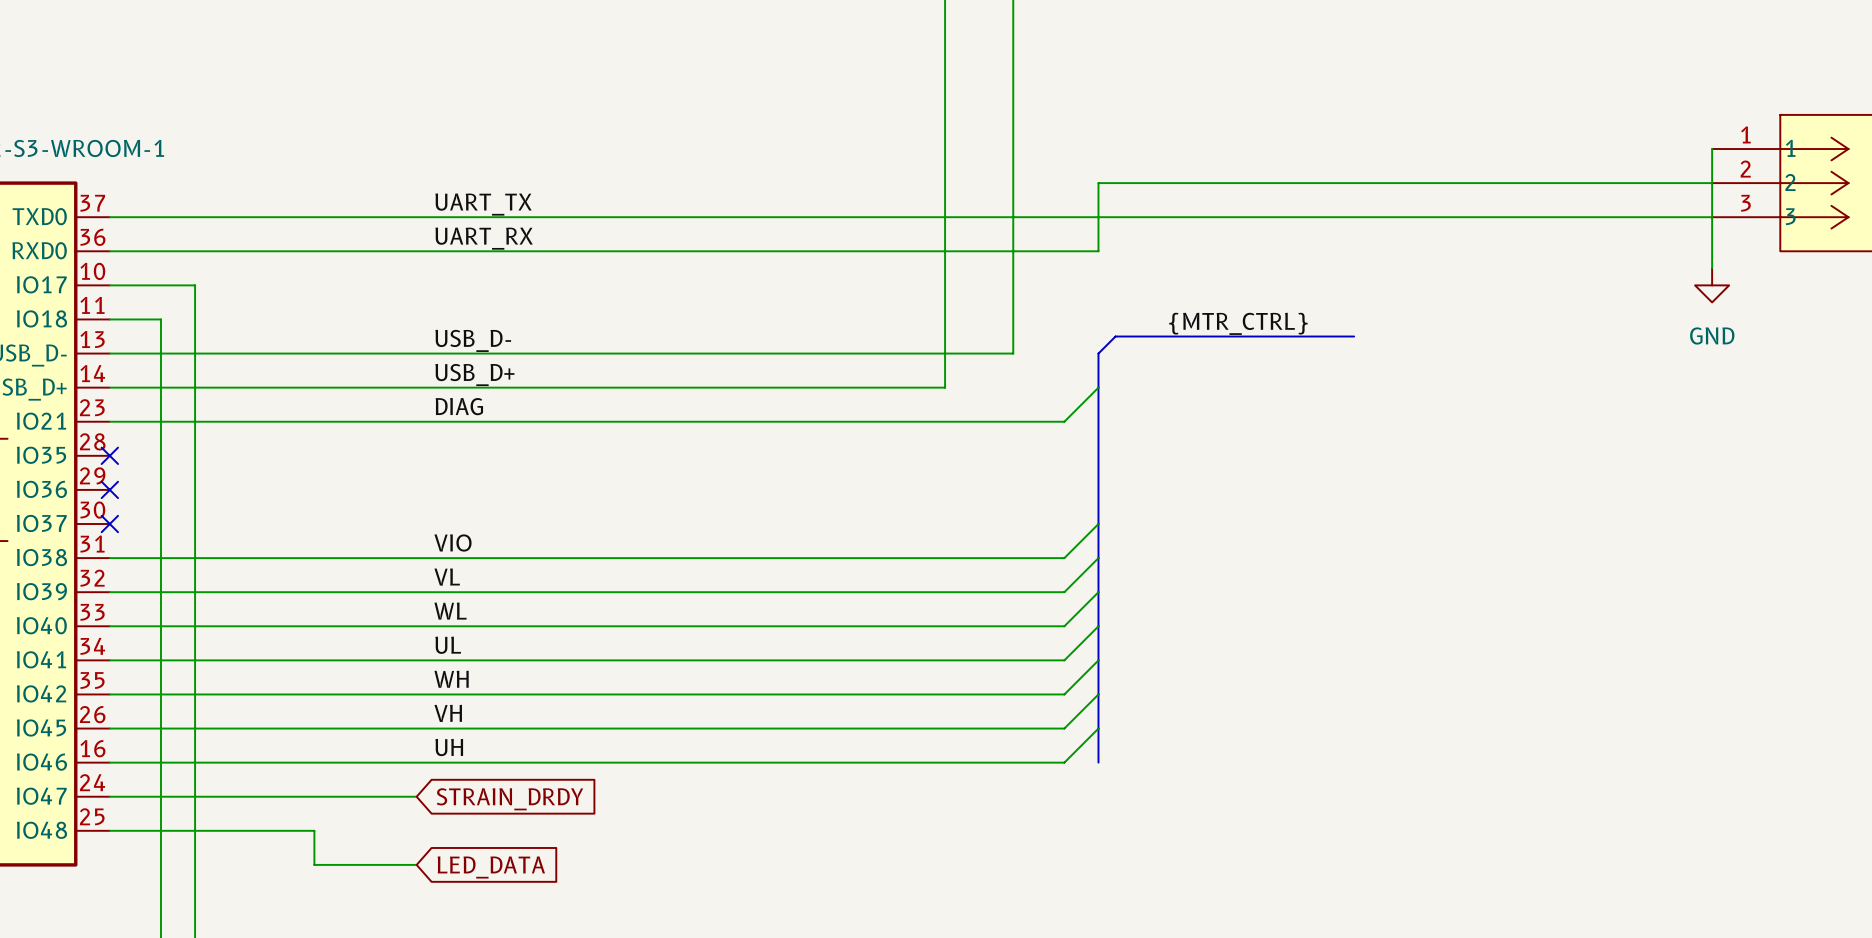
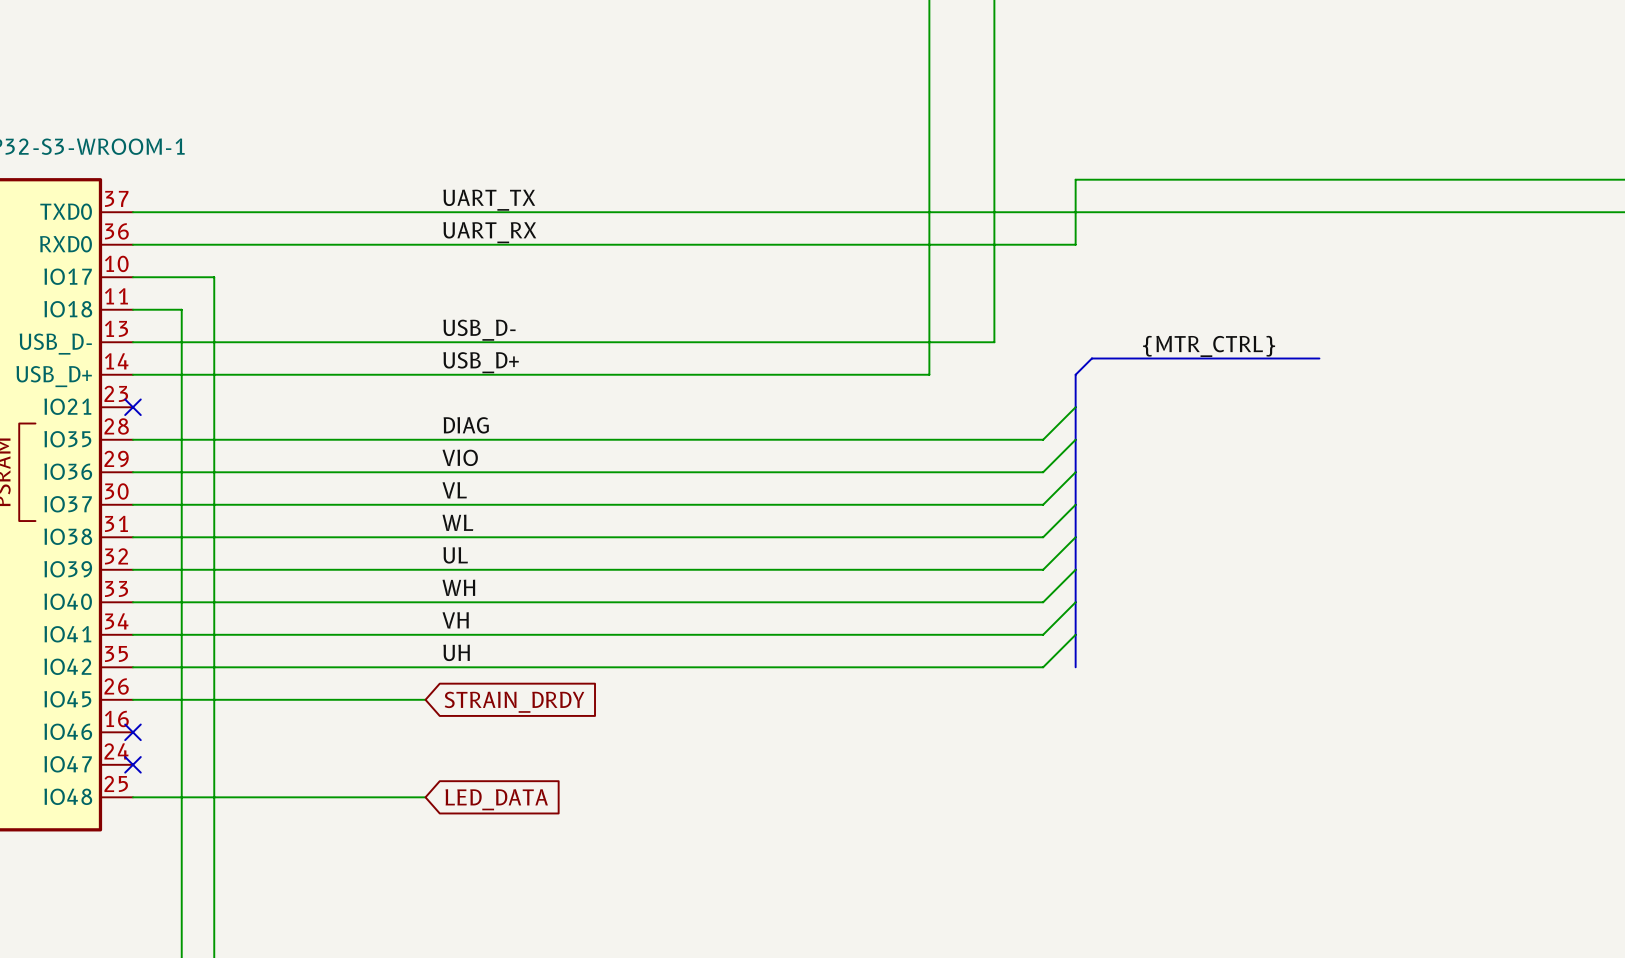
label position: {MTR_CTRL} (1238, 323) -> {MTR_CTRL} (1209, 346)
bus: (1354, 336) (1115, 336) (1098, 353) (1098, 387) -> (1319, 358) (1091, 358) (1075, 374)
wire: (1098, 387) (1064, 421) (109, 421) -> (1075, 407) (1043, 439) (132, 439)
label position: DIAG (459, 406) -> DIAG (466, 425)
no-connect mark: none -> (132, 407)
no-connect mark: (109, 455) -> none
wire: none -> (1075, 439) (1043, 472) (132, 472)
label: none -> VIO (460, 457)
no-connect mark: (109, 489) -> none
label: none -> VL (454, 490)
no-connect mark: (109, 524) -> none
label: VIO (453, 543) -> WL (457, 522)
label: VL (447, 577) -> UL (455, 555)
label: WL (450, 611) -> WH (458, 587)
label: UL (448, 645) -> VH (455, 620)
label: WH (451, 679) -> UH (456, 652)
wire: (1098, 694) (1064, 728) (416, 728) -> none
bus: (1098, 694) (1098, 762) -> none
label: VH (448, 713) -> none
wire: (1098, 728) (1064, 762) (109, 762) -> (1075, 472) (1043, 504) (132, 504)
label: UH (449, 747) -> none
no-connect mark: none -> (132, 732)
wire: (109, 796) (416, 796) -> none
no-connect mark: none -> (132, 764)
global label position: STRAIN_DRDY (509, 799) -> STRAIN_DRDY (514, 702)
wire: (314, 830) (314, 864) (416, 864) -> (328, 797) (425, 797)
global label position: LED_DATA (491, 867) -> LED_DATA (496, 799)

